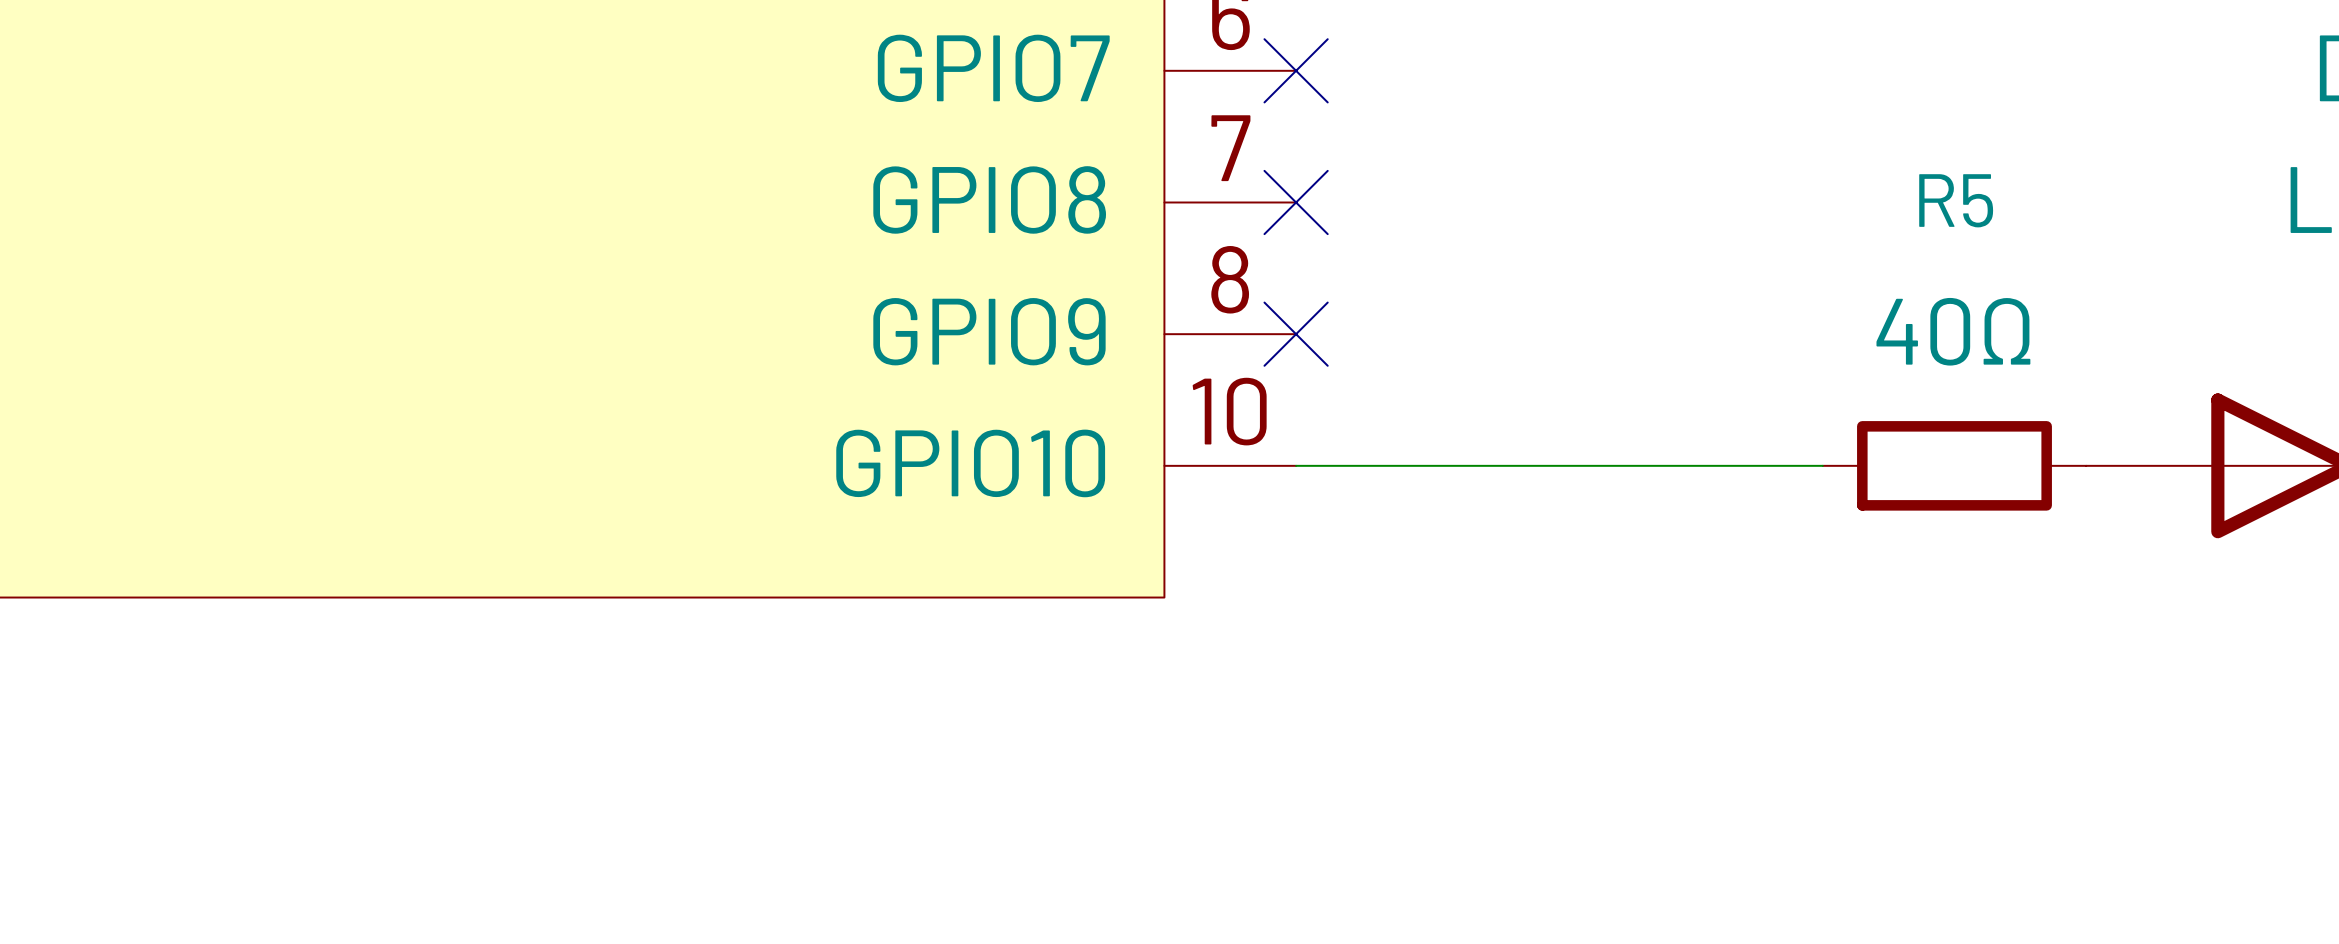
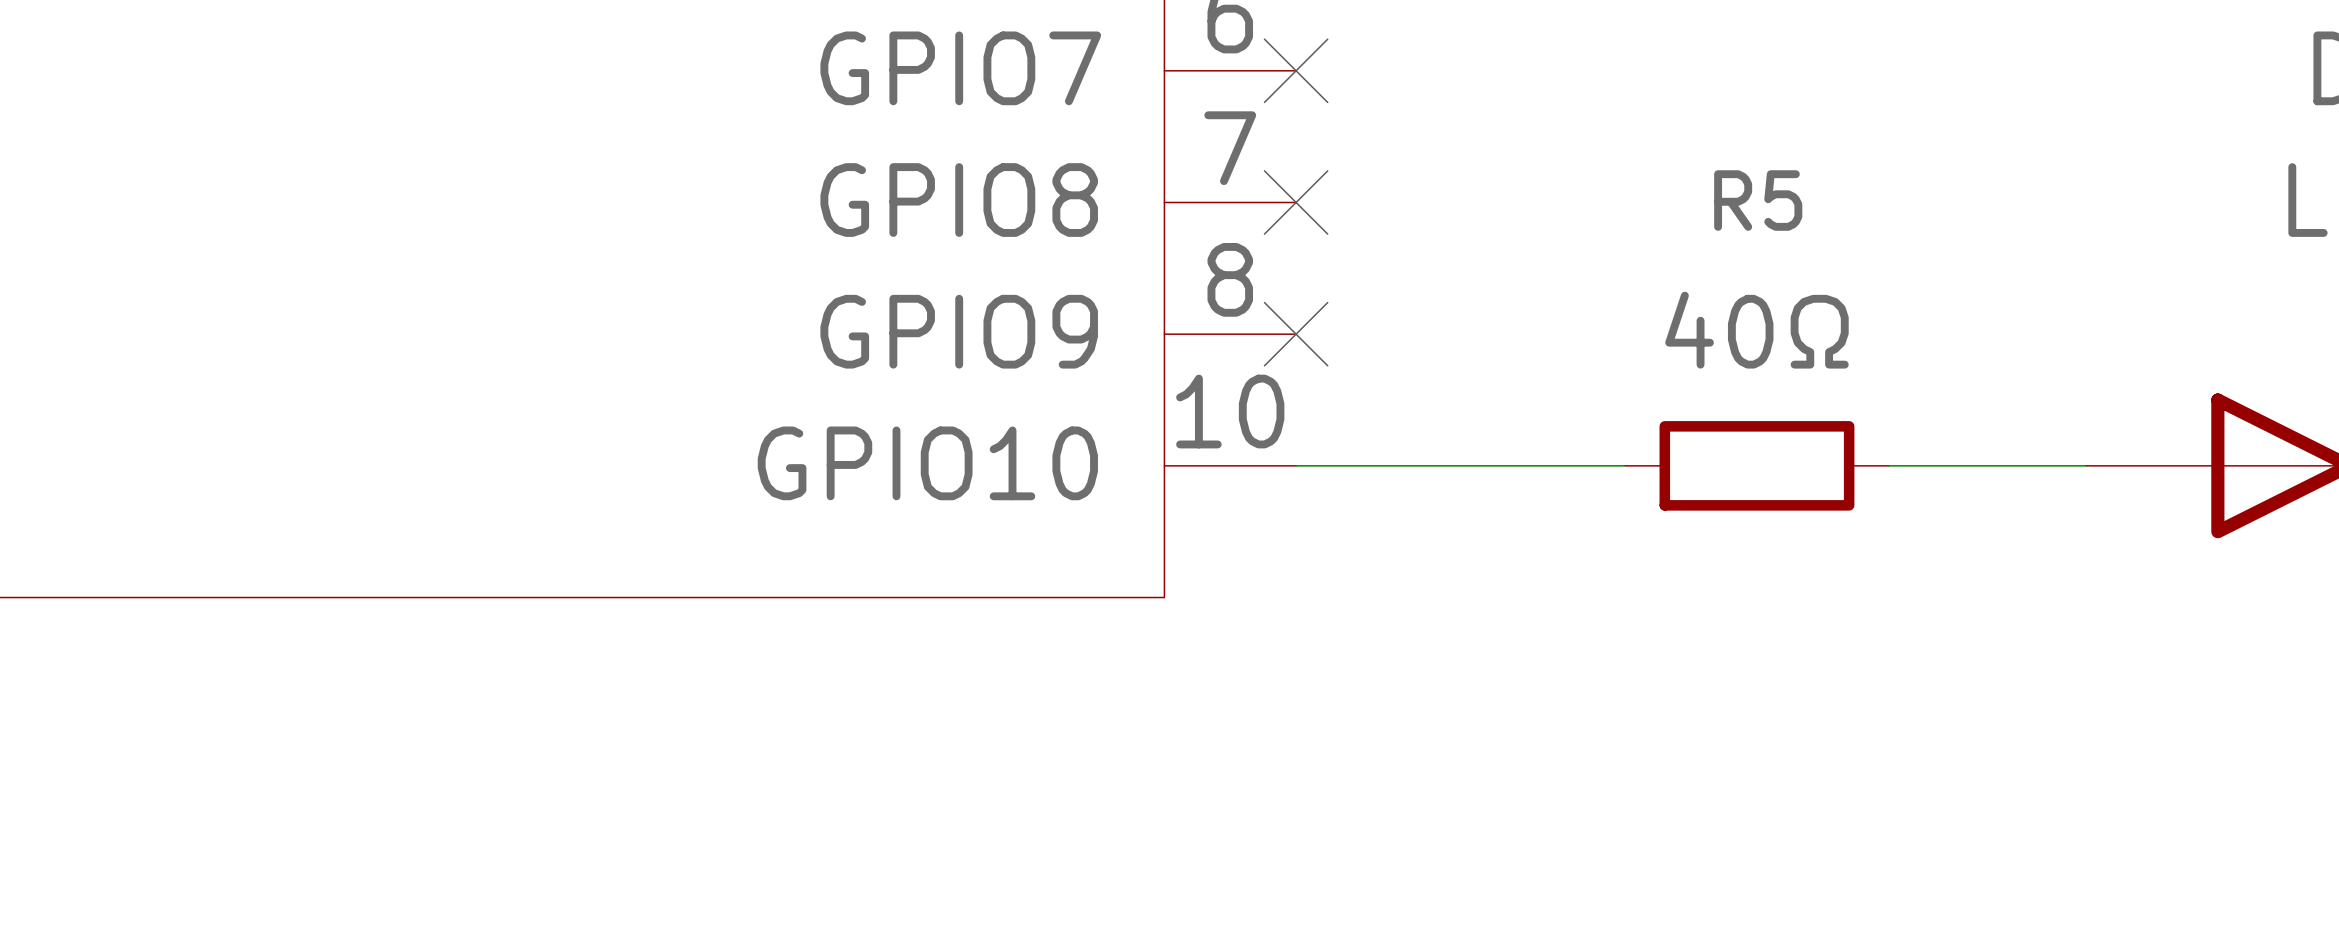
wire: (1625, 465) (1822, 465) -> (1888, 465) (2086, 465)
R5 position: (1954, 465) -> (1756, 465)

